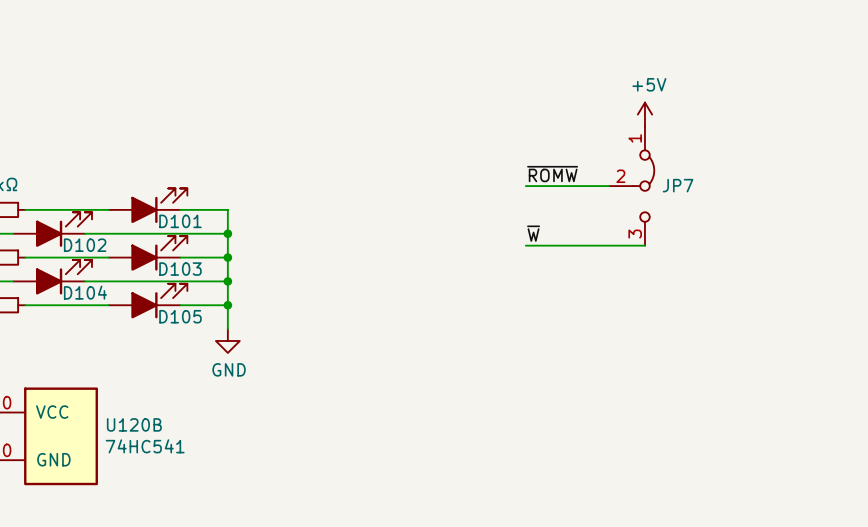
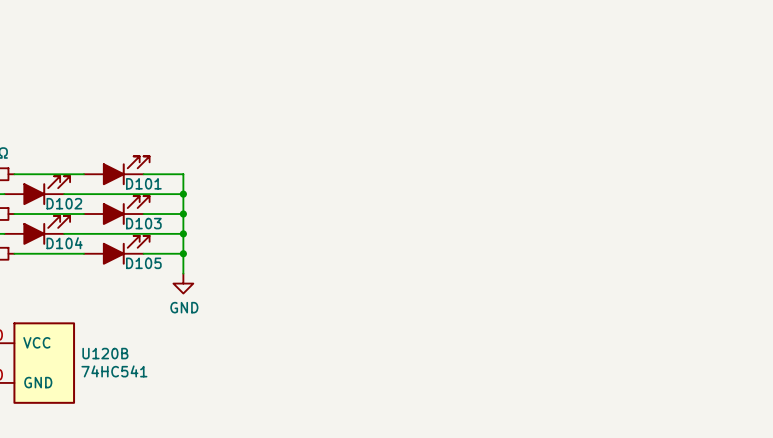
power symbol: +5V (644, 114) -> none
label: ~{ROMW} (552, 174) -> none
wire: (525, 186) (609, 186) -> none
JP7: (631, 186) -> none
label: ~{W} (533, 233) -> none
wire: (525, 245) (644, 245) -> none

